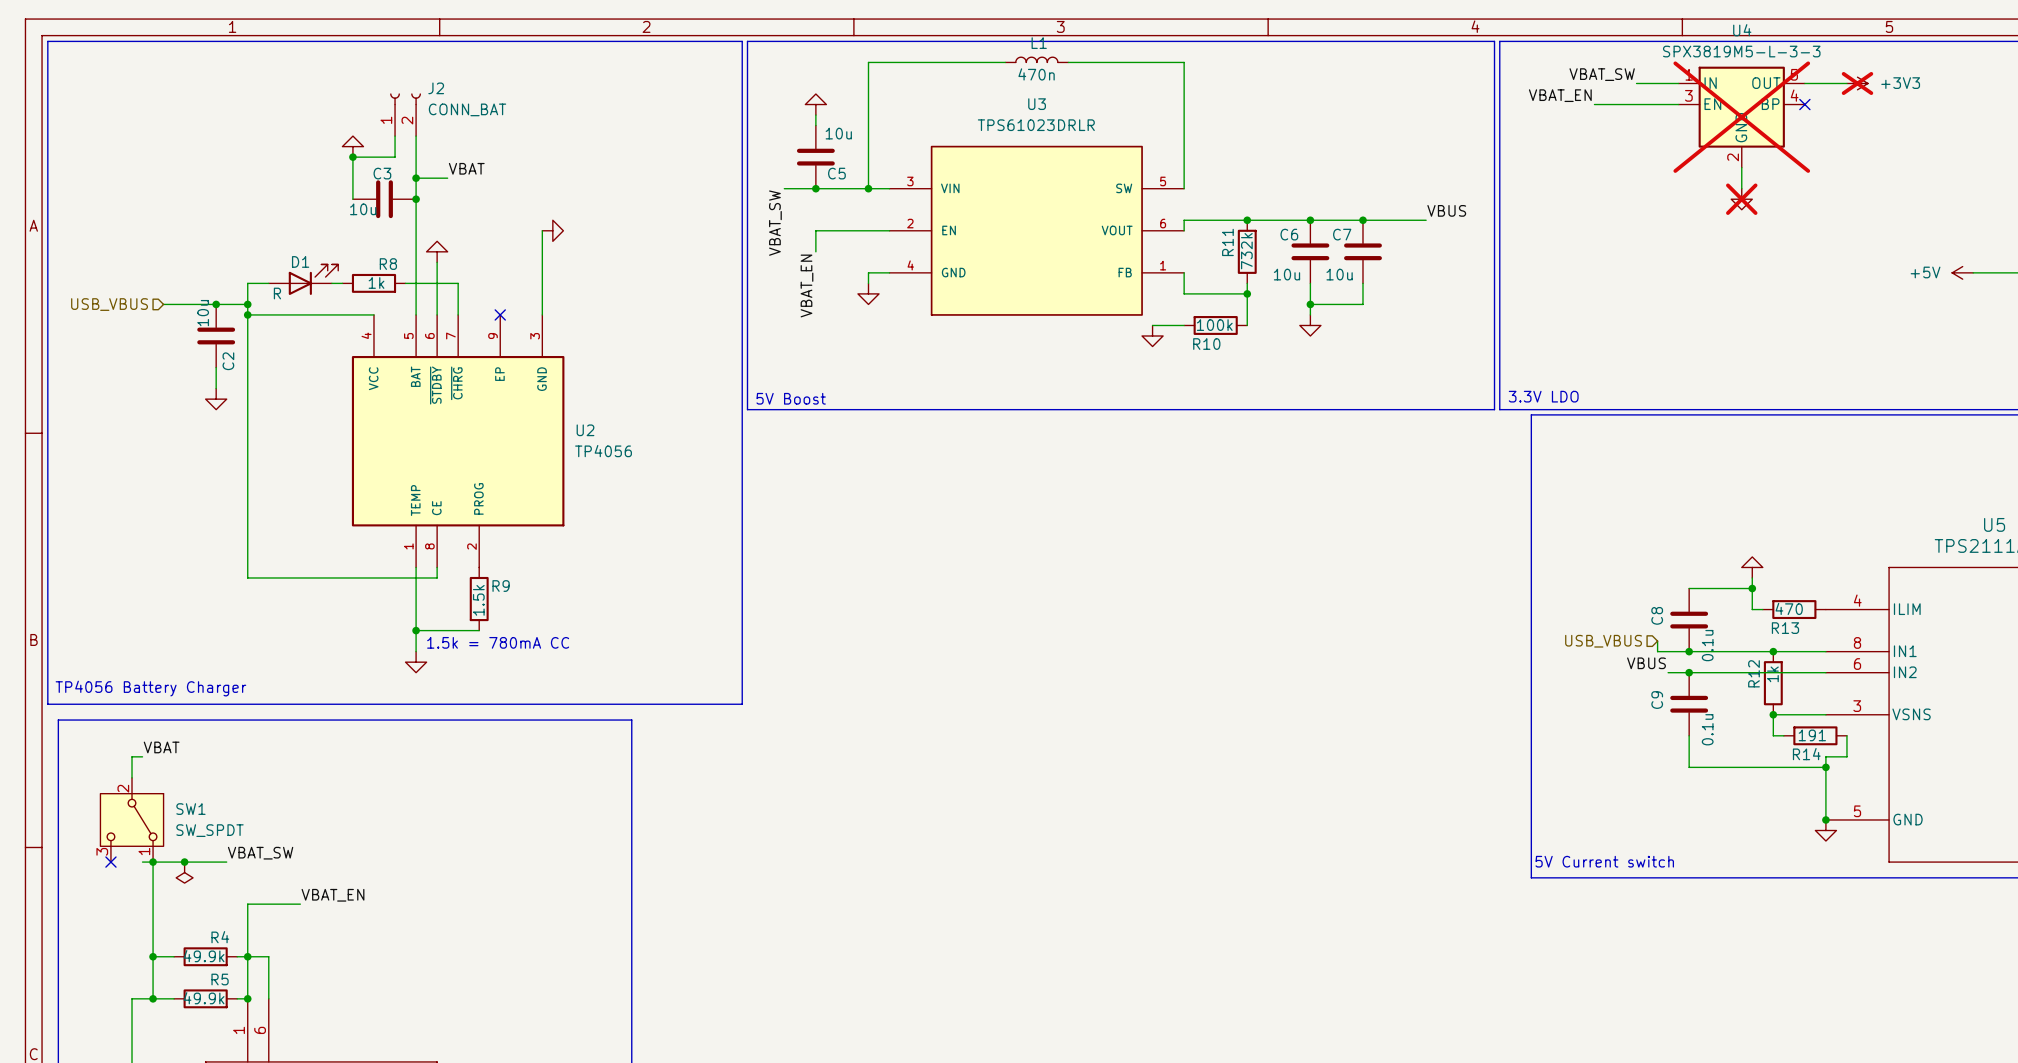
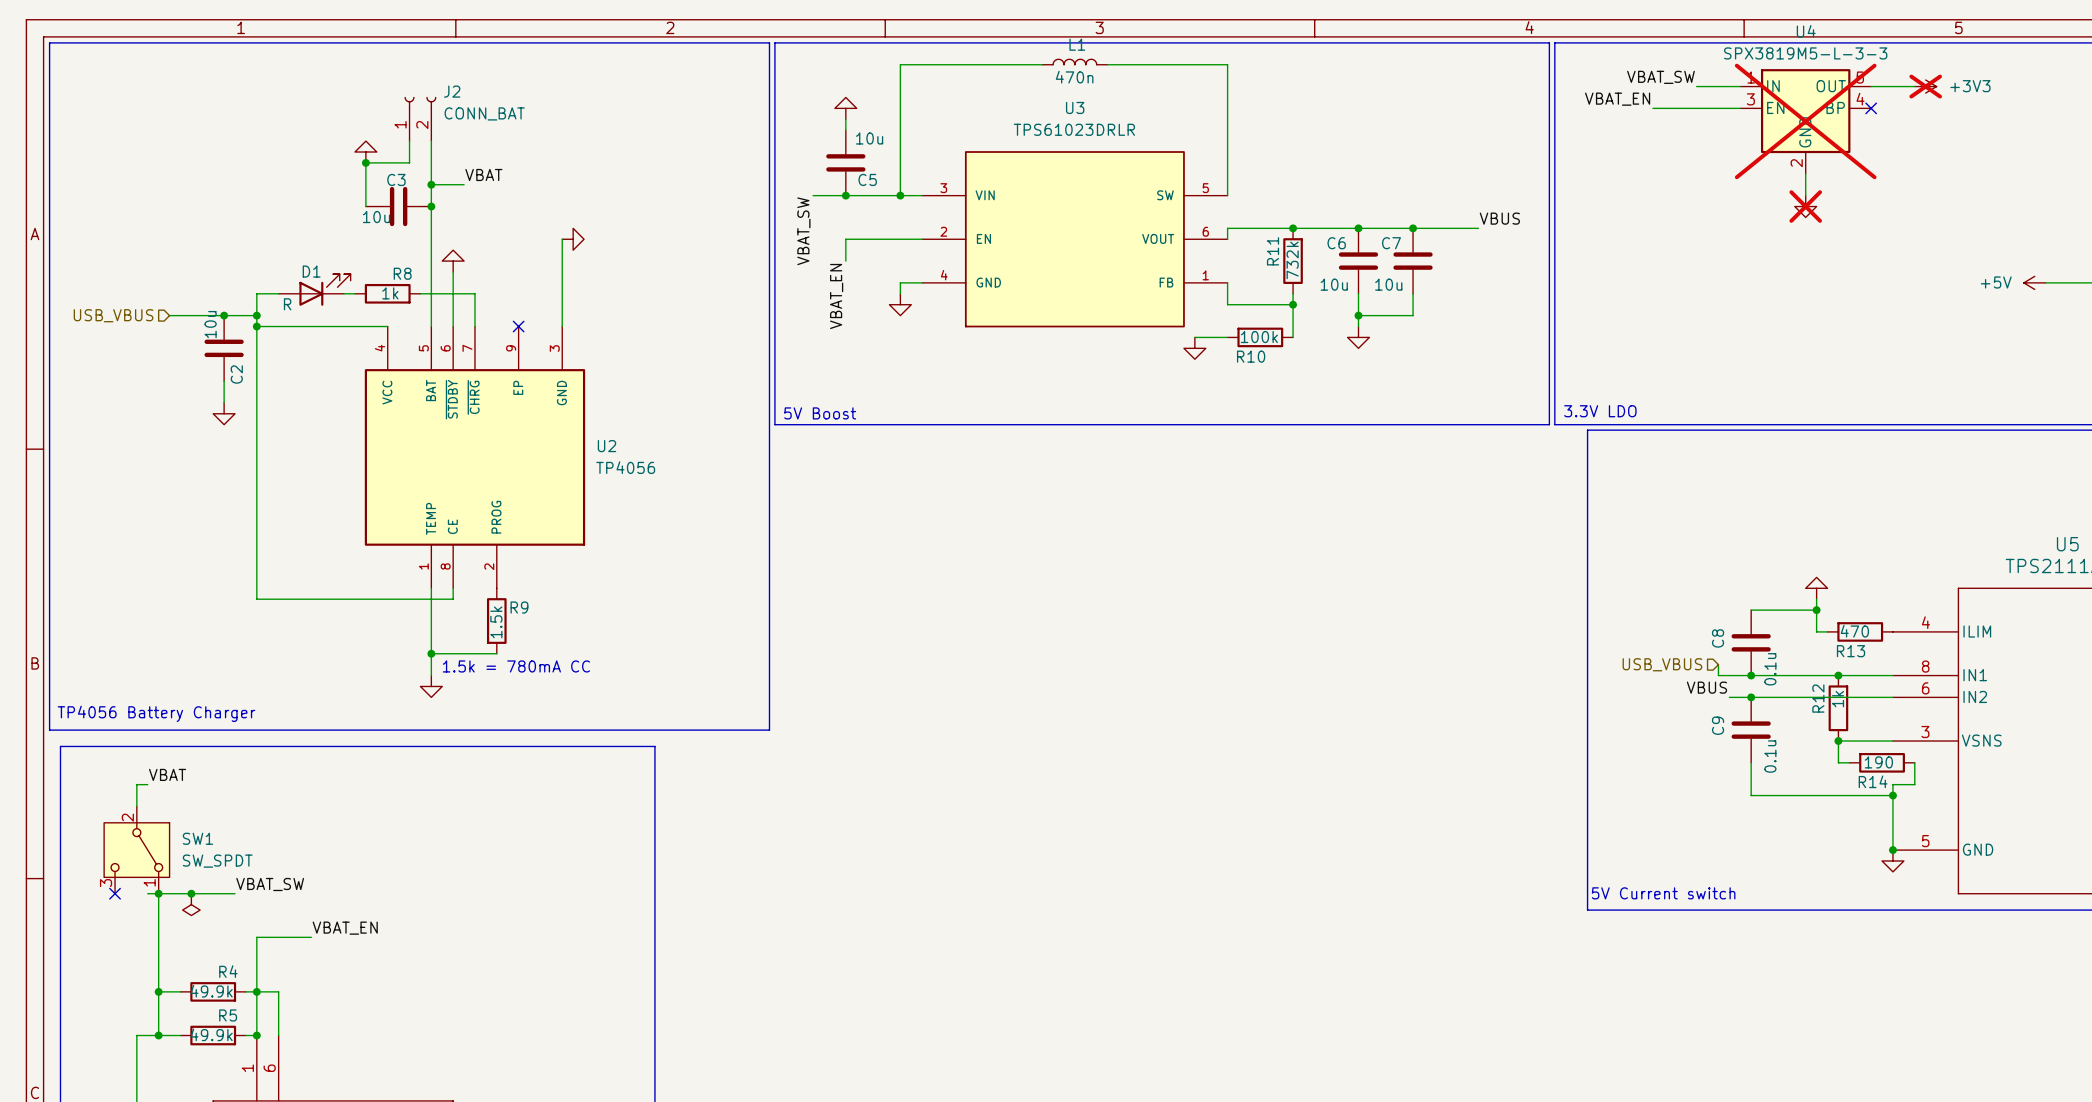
R14 value: 191 (1812, 735) -> 190 (1878, 762)

